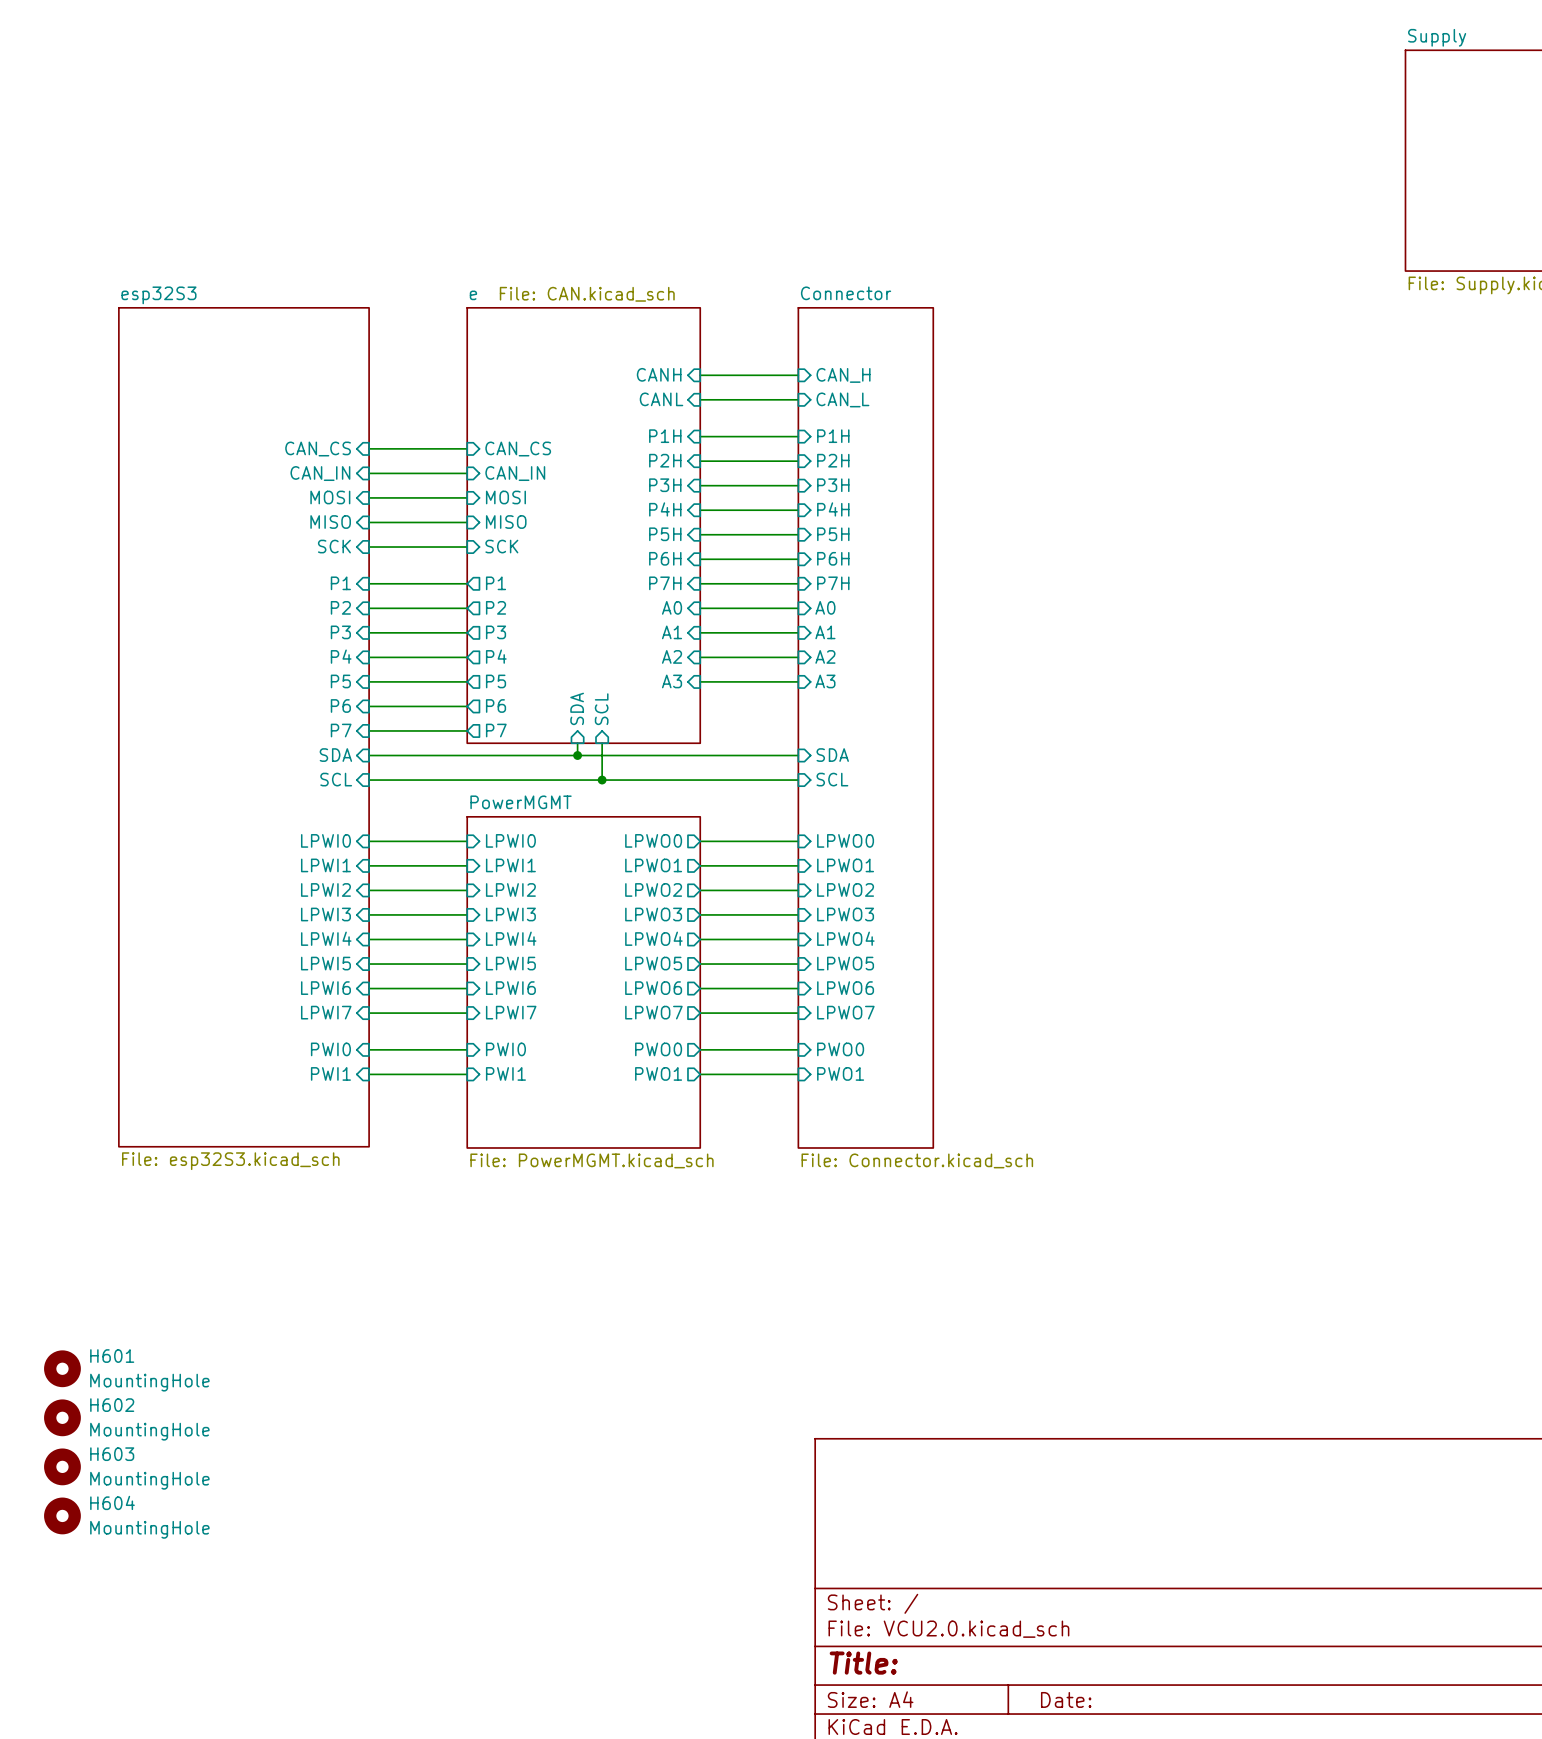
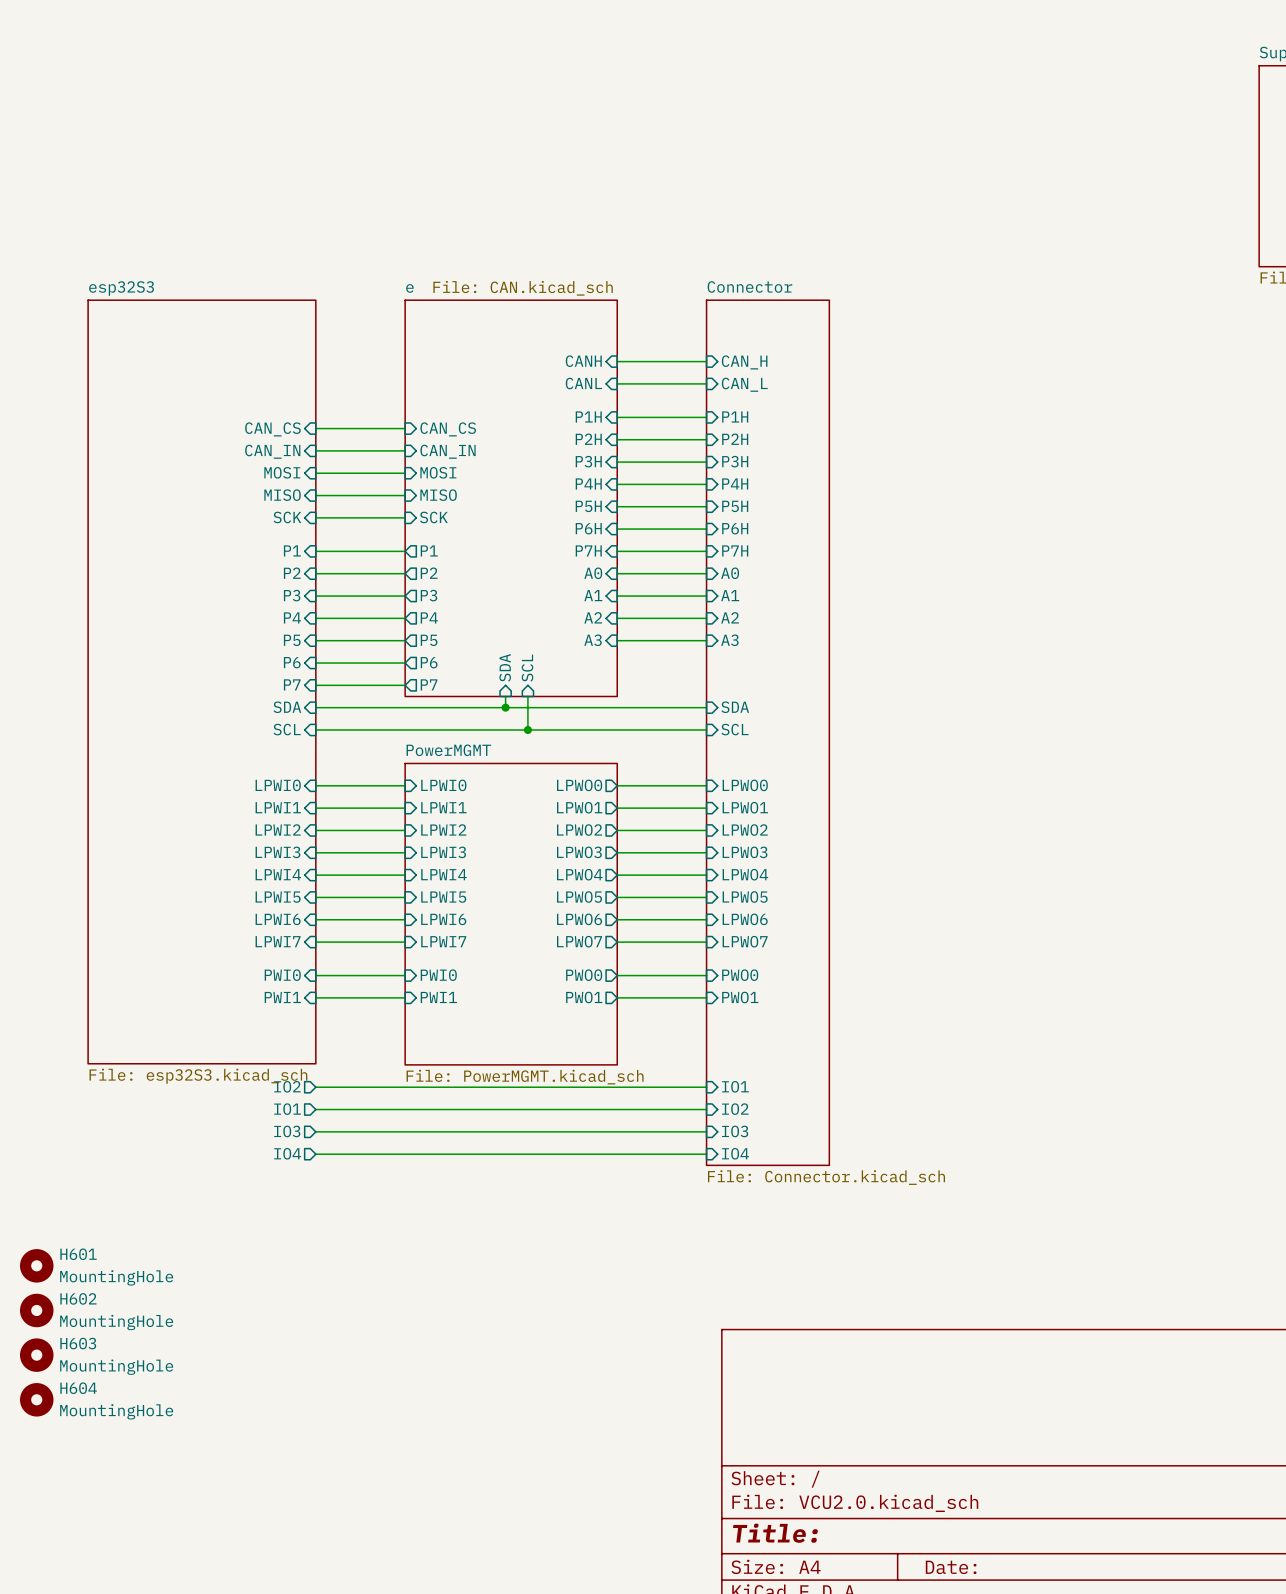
sheet Connector: File: Connector.kicad_sch (865, 727) -> none
sheet Connector: none -> File: Connector.kicad_sch (767, 732)
sheet pin: none -> IO2 (287, 1086)
wire: none -> (315, 1087) (706, 1087)
sheet pin: none -> IO1 (735, 1086)
sheet pin: none -> IO1 (287, 1109)
sheet pin: none -> IO2 (735, 1109)
wire: none -> (315, 1109) (706, 1109)
sheet pin: none -> IO3 (287, 1131)
wire: none -> (315, 1131) (706, 1131)
sheet pin: none -> IO3 (735, 1131)
sheet pin: none -> IO4 (287, 1153)
sheet pin: none -> IO4 (735, 1153)
wire: none -> (315, 1154) (706, 1154)

